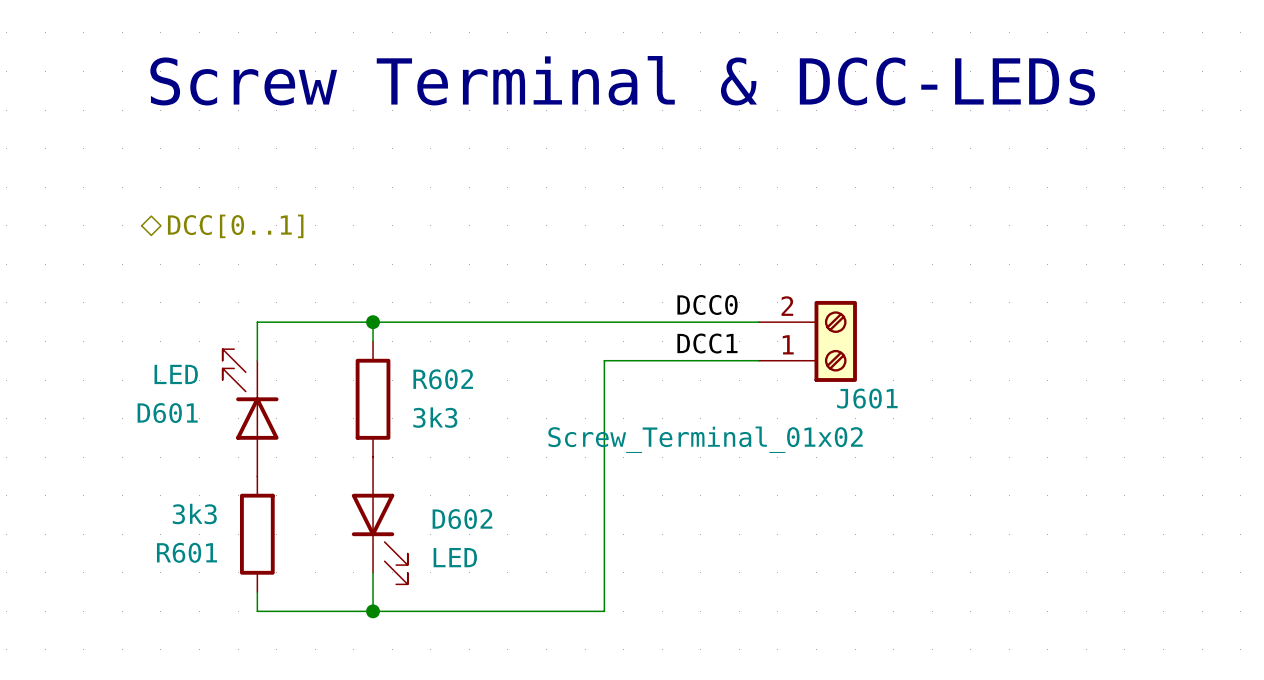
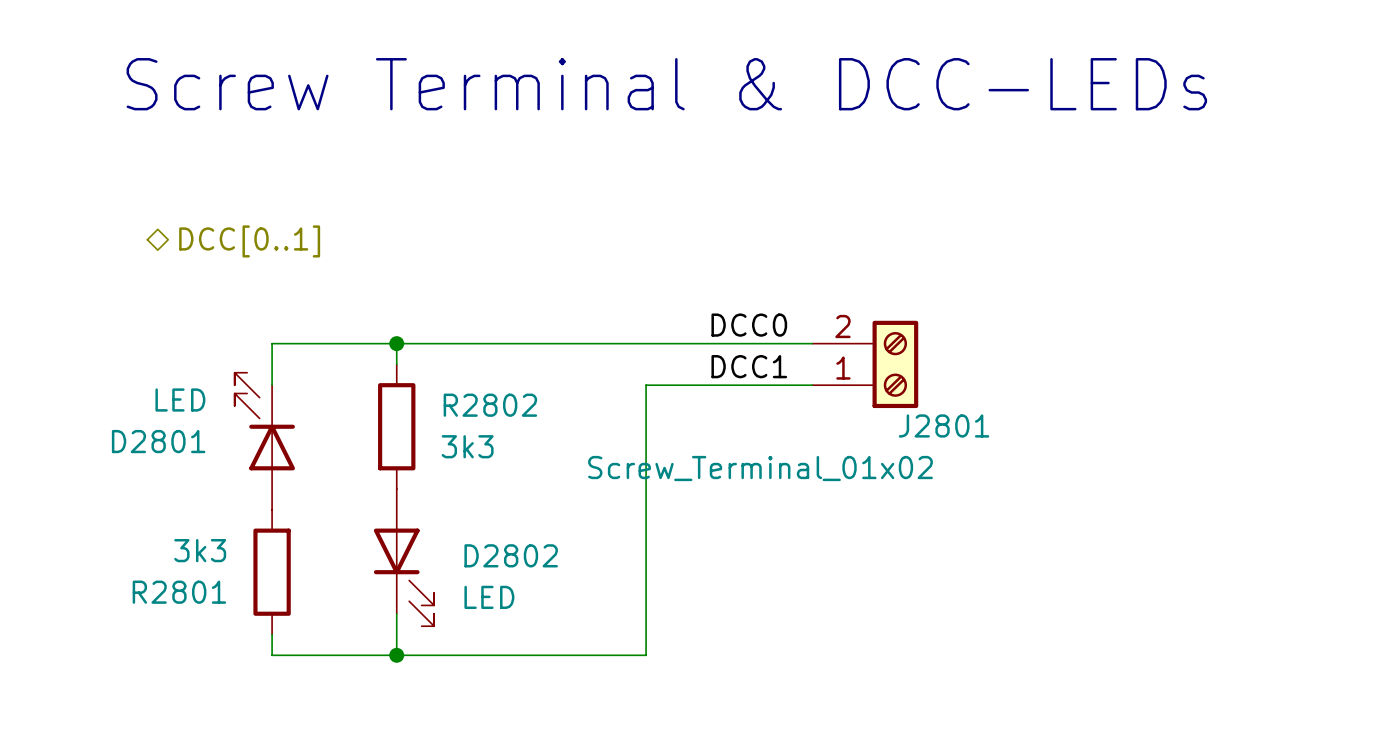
R602 name: R602 (443, 379) -> R2802 (490, 405)
J601 name: J601 (867, 398) -> J2801 (944, 425)
D601 name: D601 (167, 413) -> D2801 (158, 441)
D602 name: D602 (462, 519) -> D2802 (511, 555)
R601 name: R601 (186, 552) -> R2801 (179, 592)

